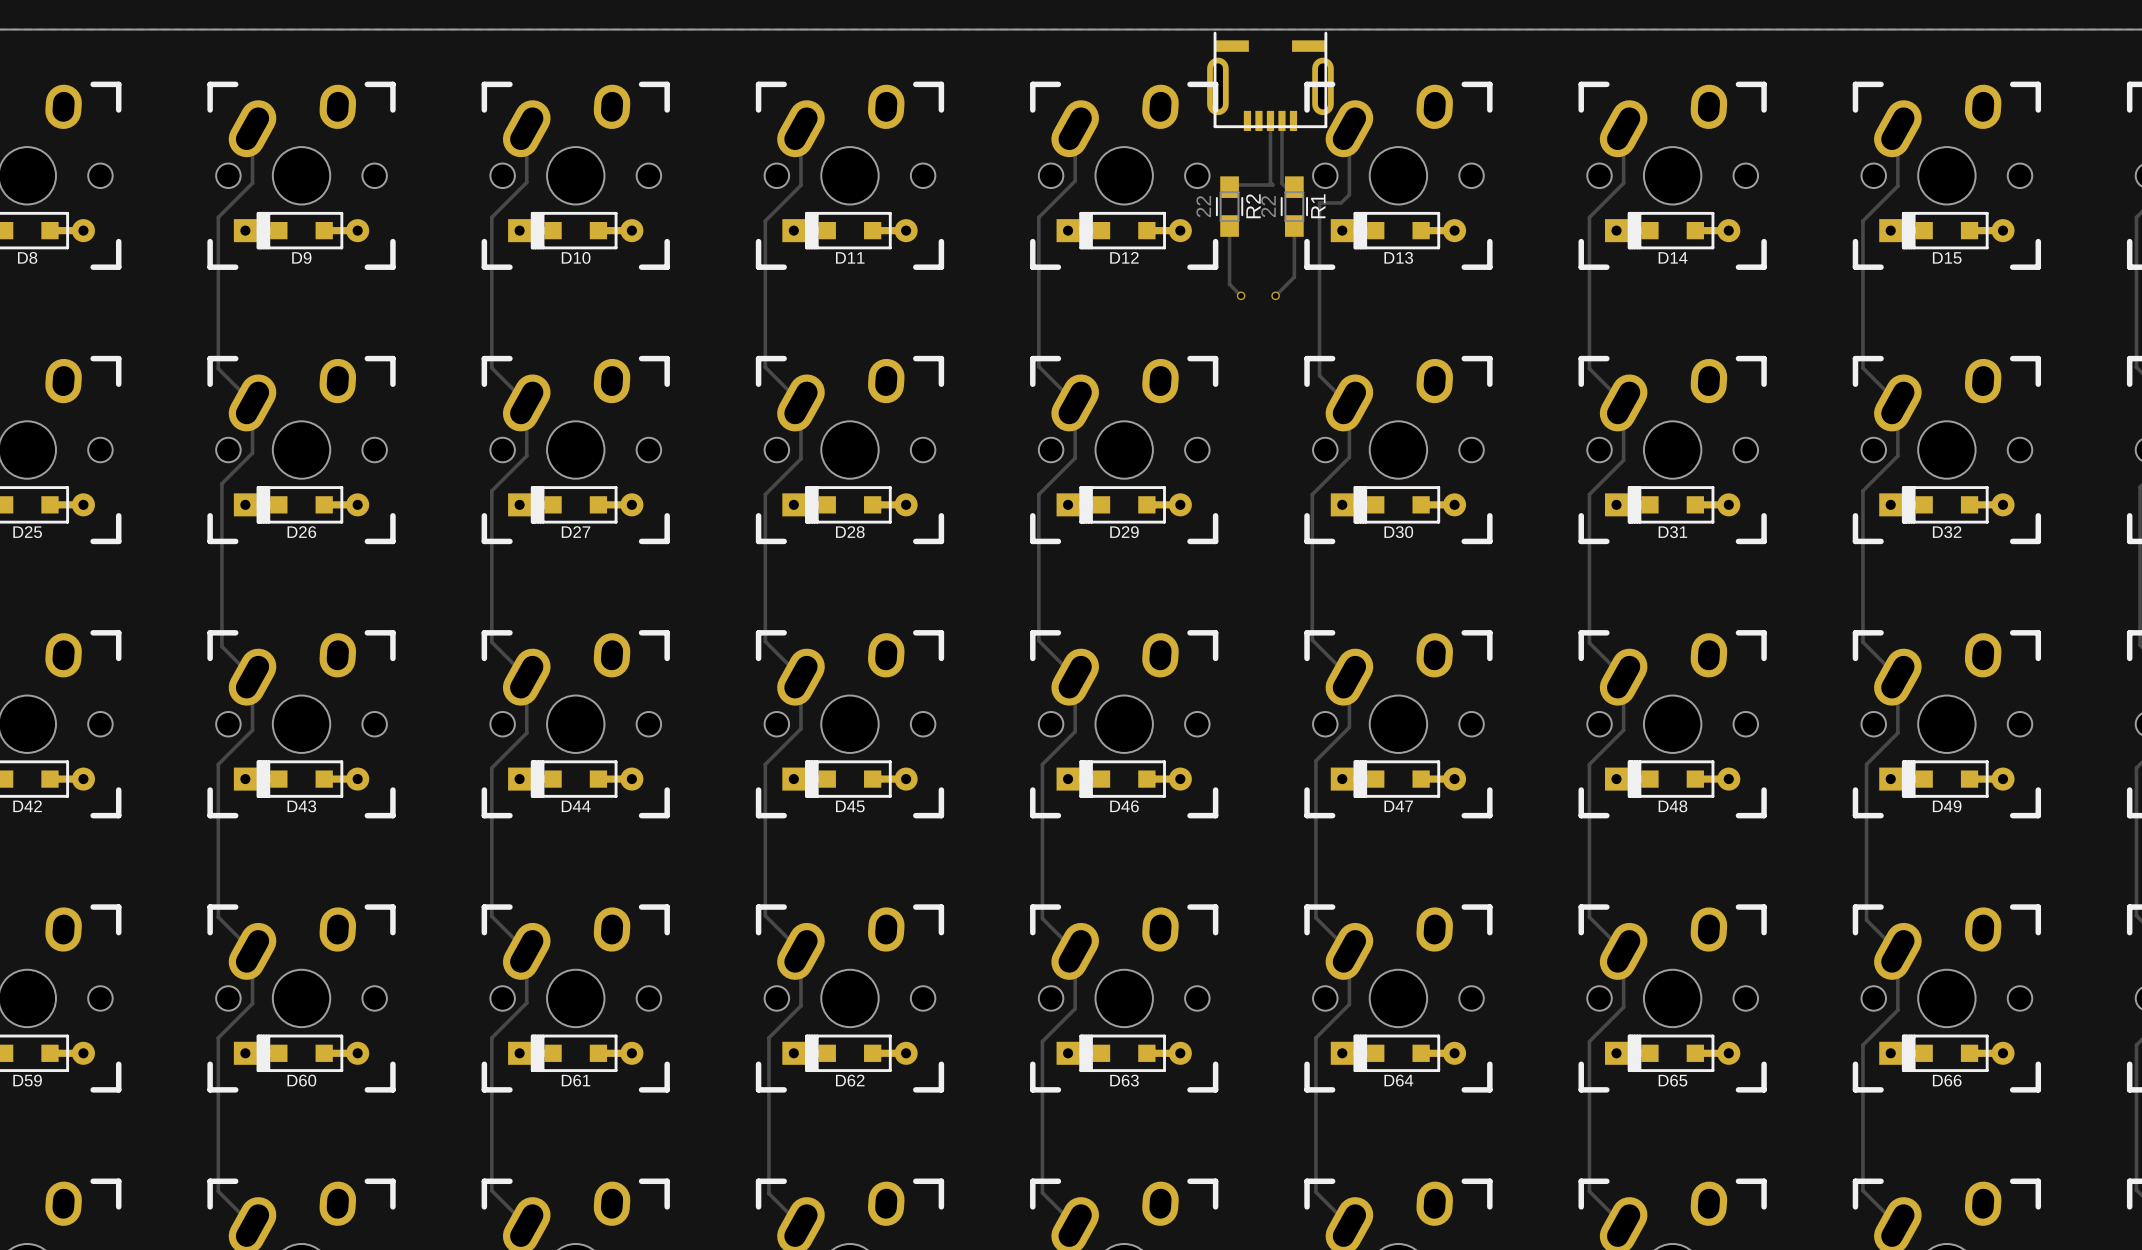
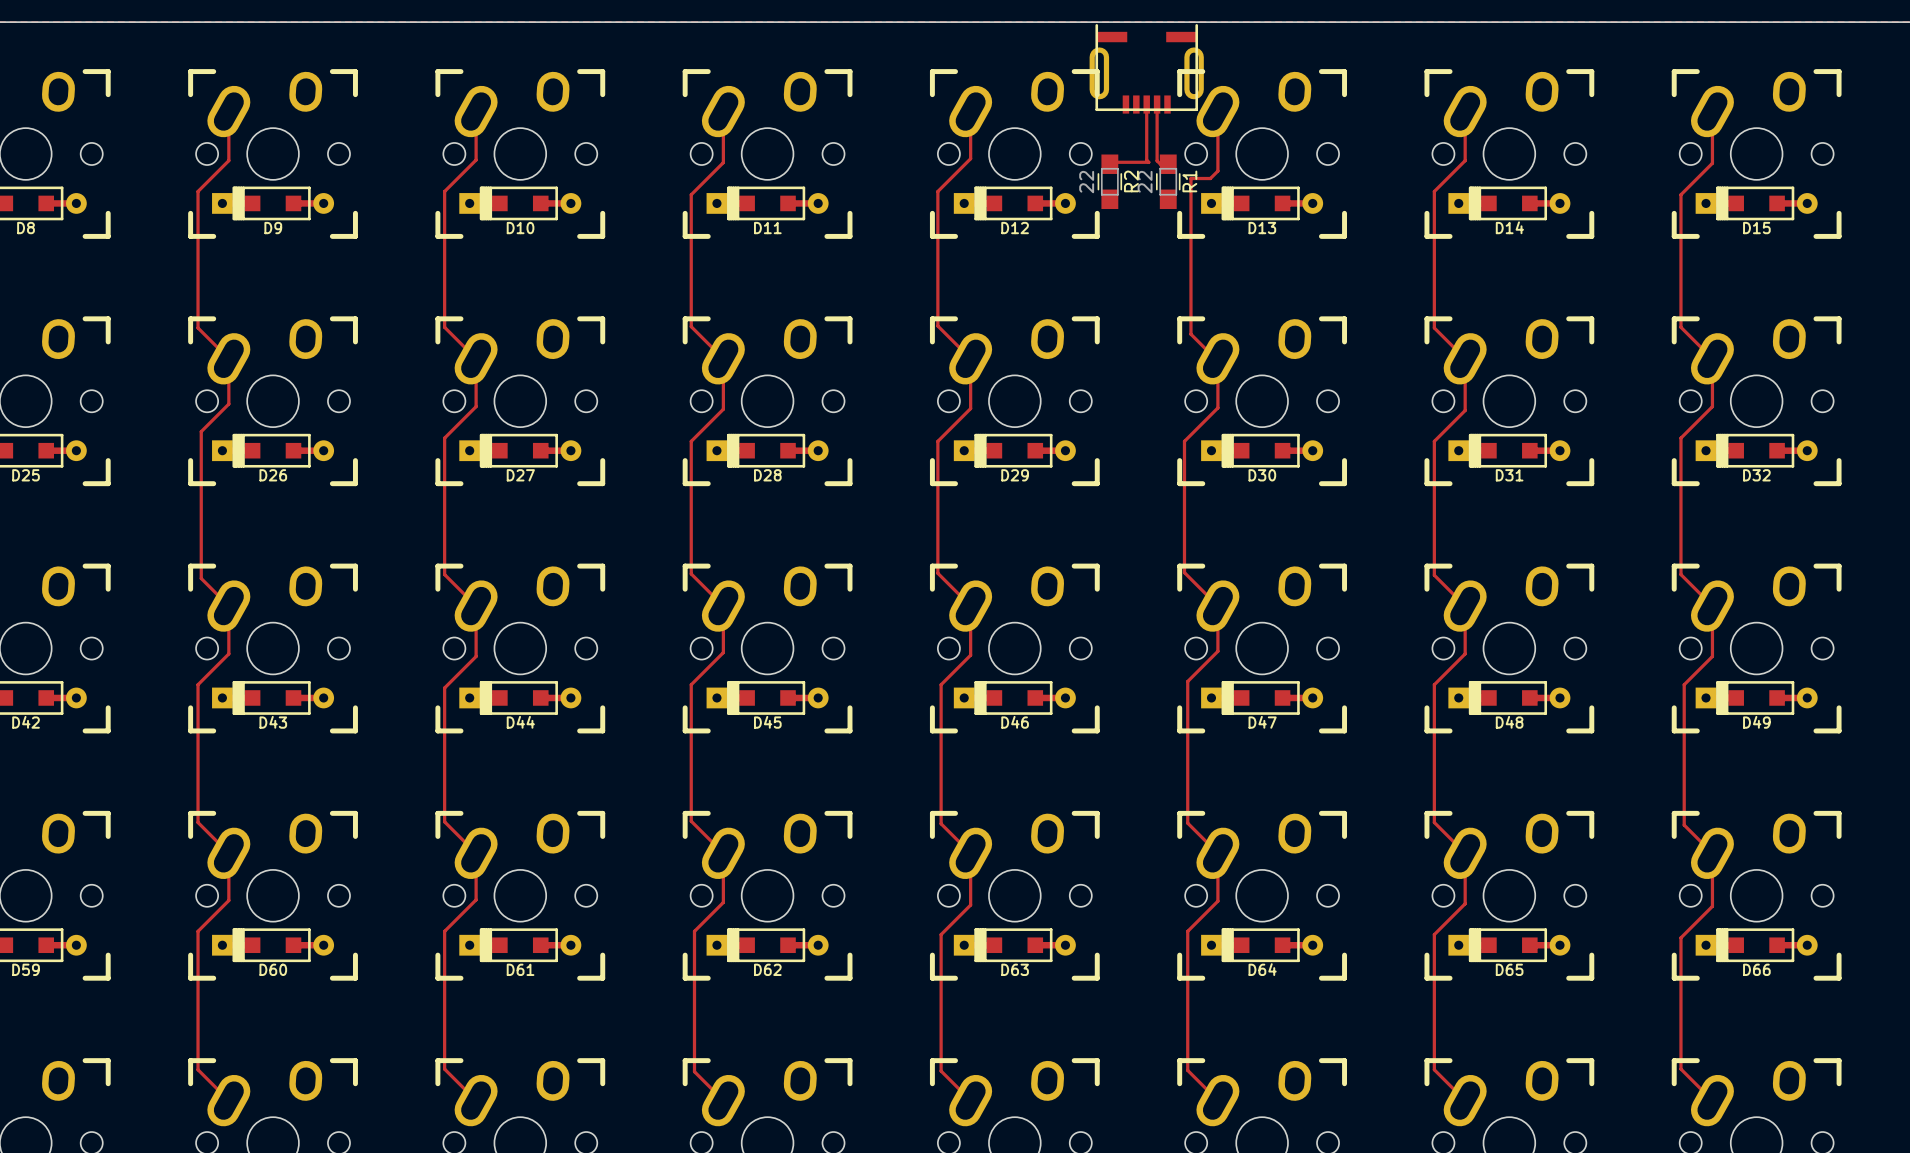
track: (1229, 226) (1229, 284) (1241, 295) -> none
track: (1294, 226) (1294, 277) (1275, 295) -> none
via: (1241, 295) -> none
via: (1275, 295) -> none

